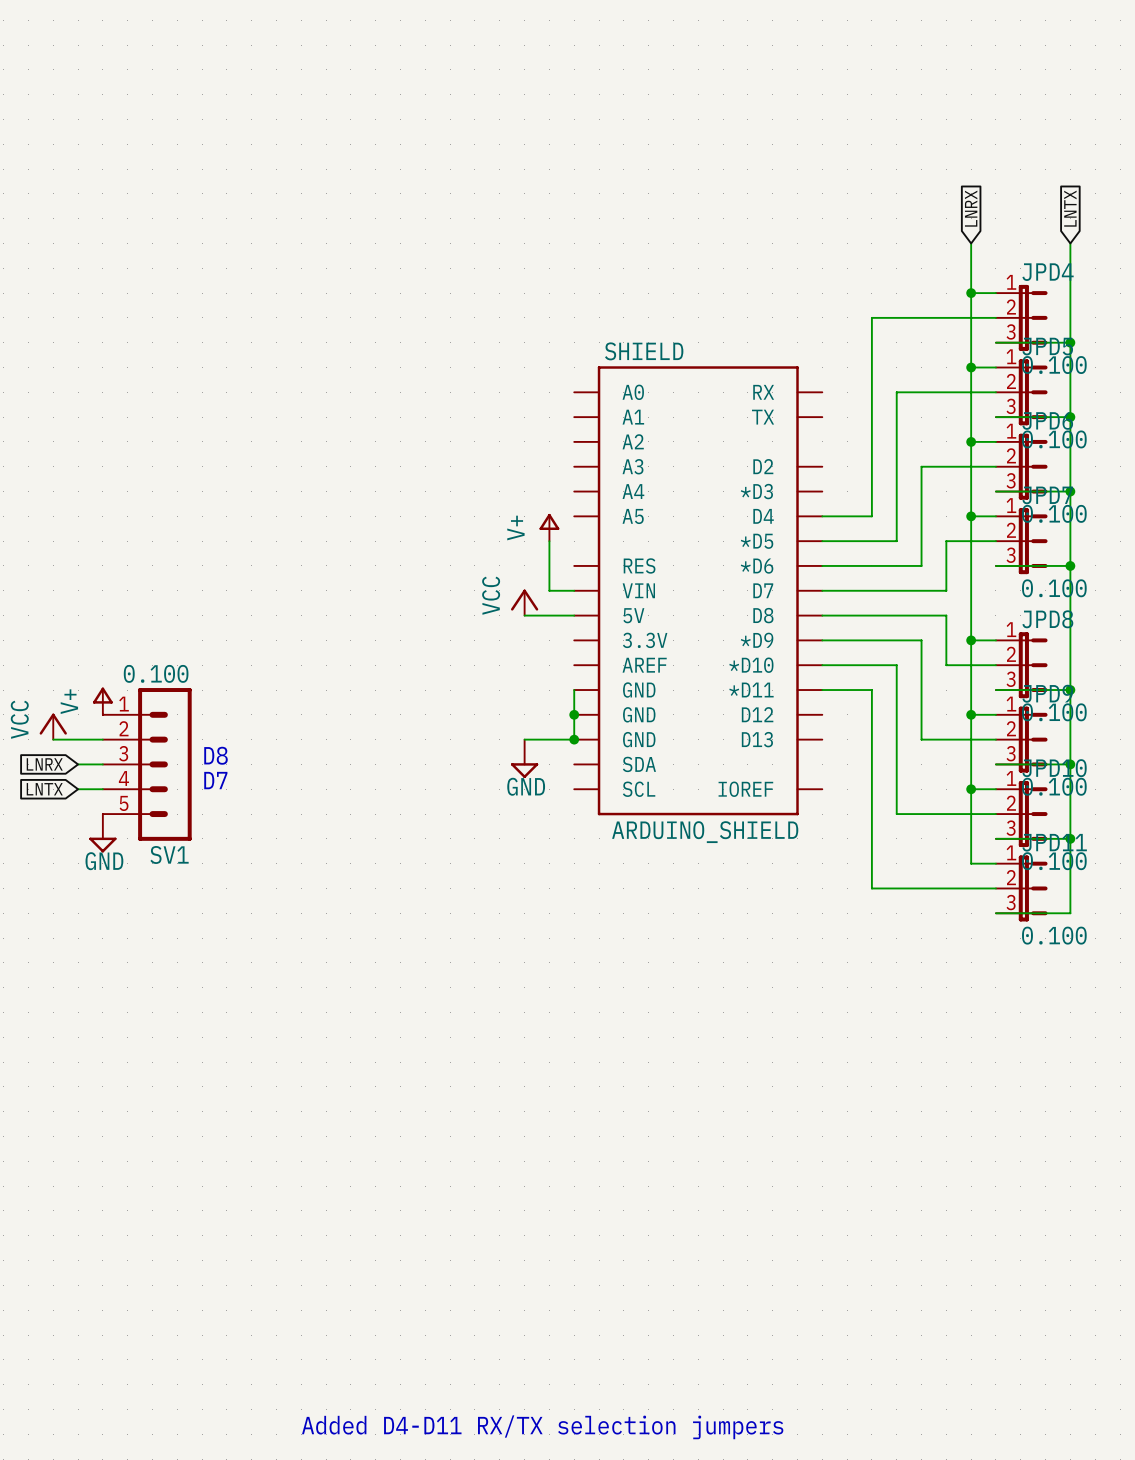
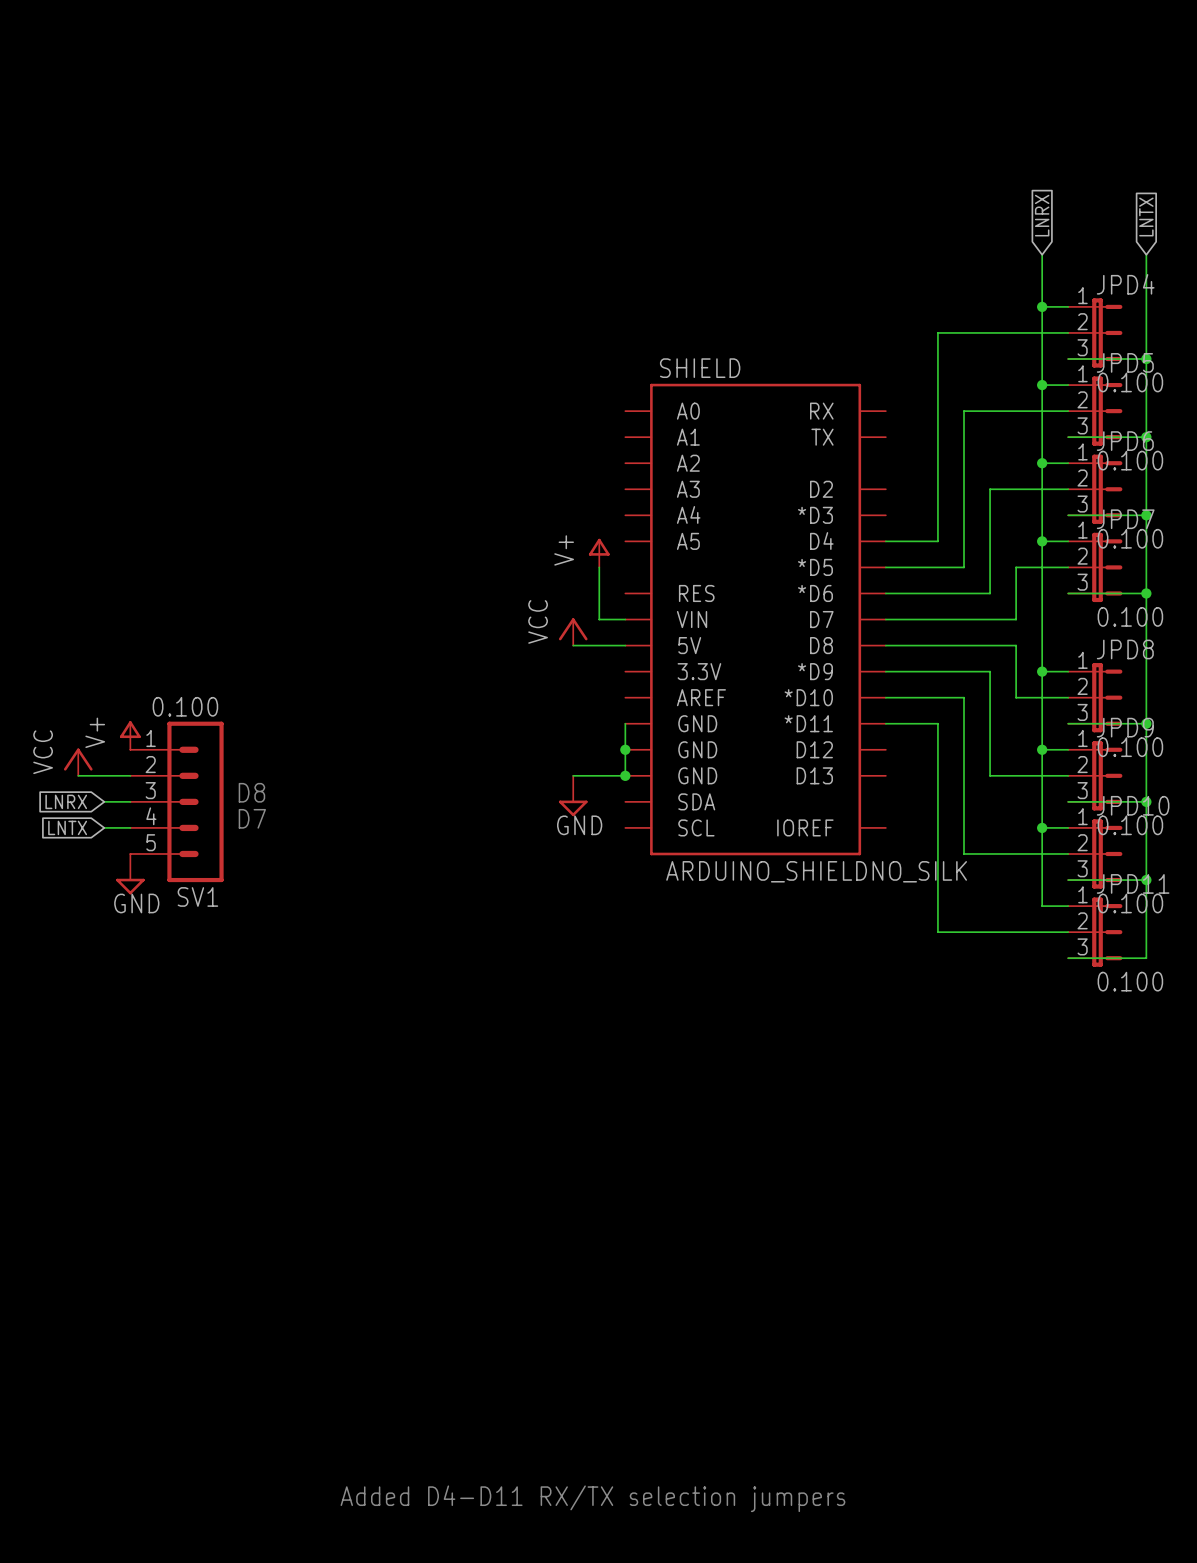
SHIELD value: ARDUINO_SHIELD (705, 832) -> ARDUINO_SHIELDNO_SILK (816, 871)

